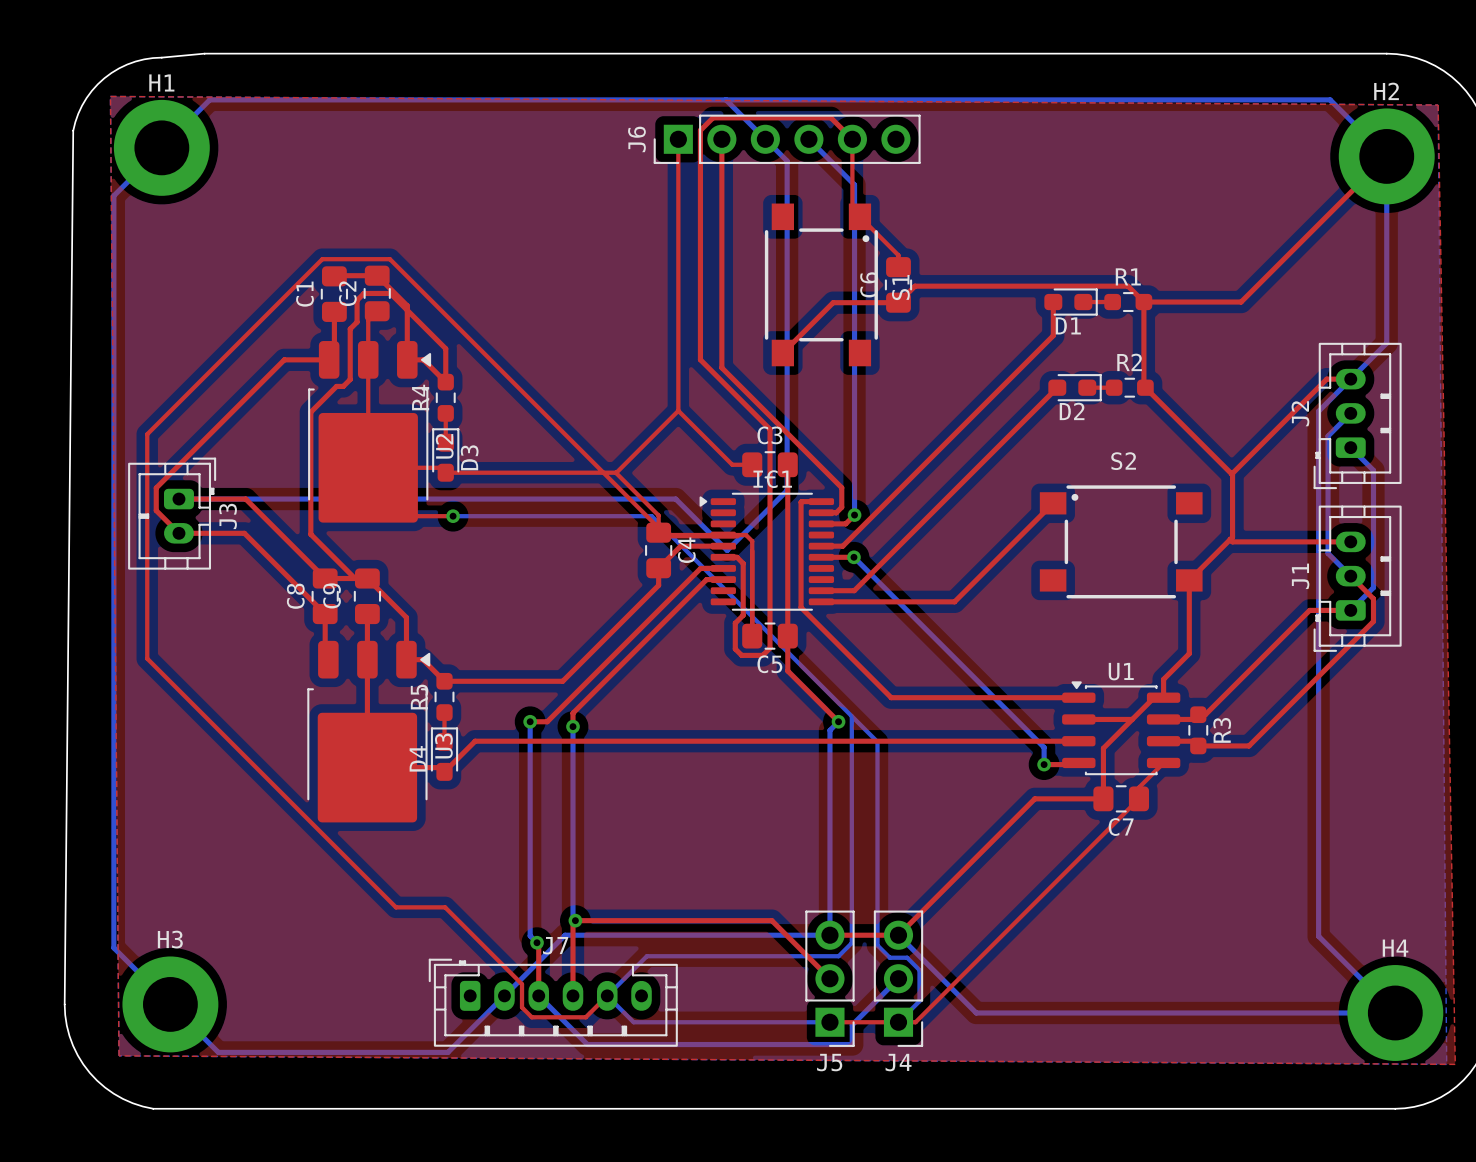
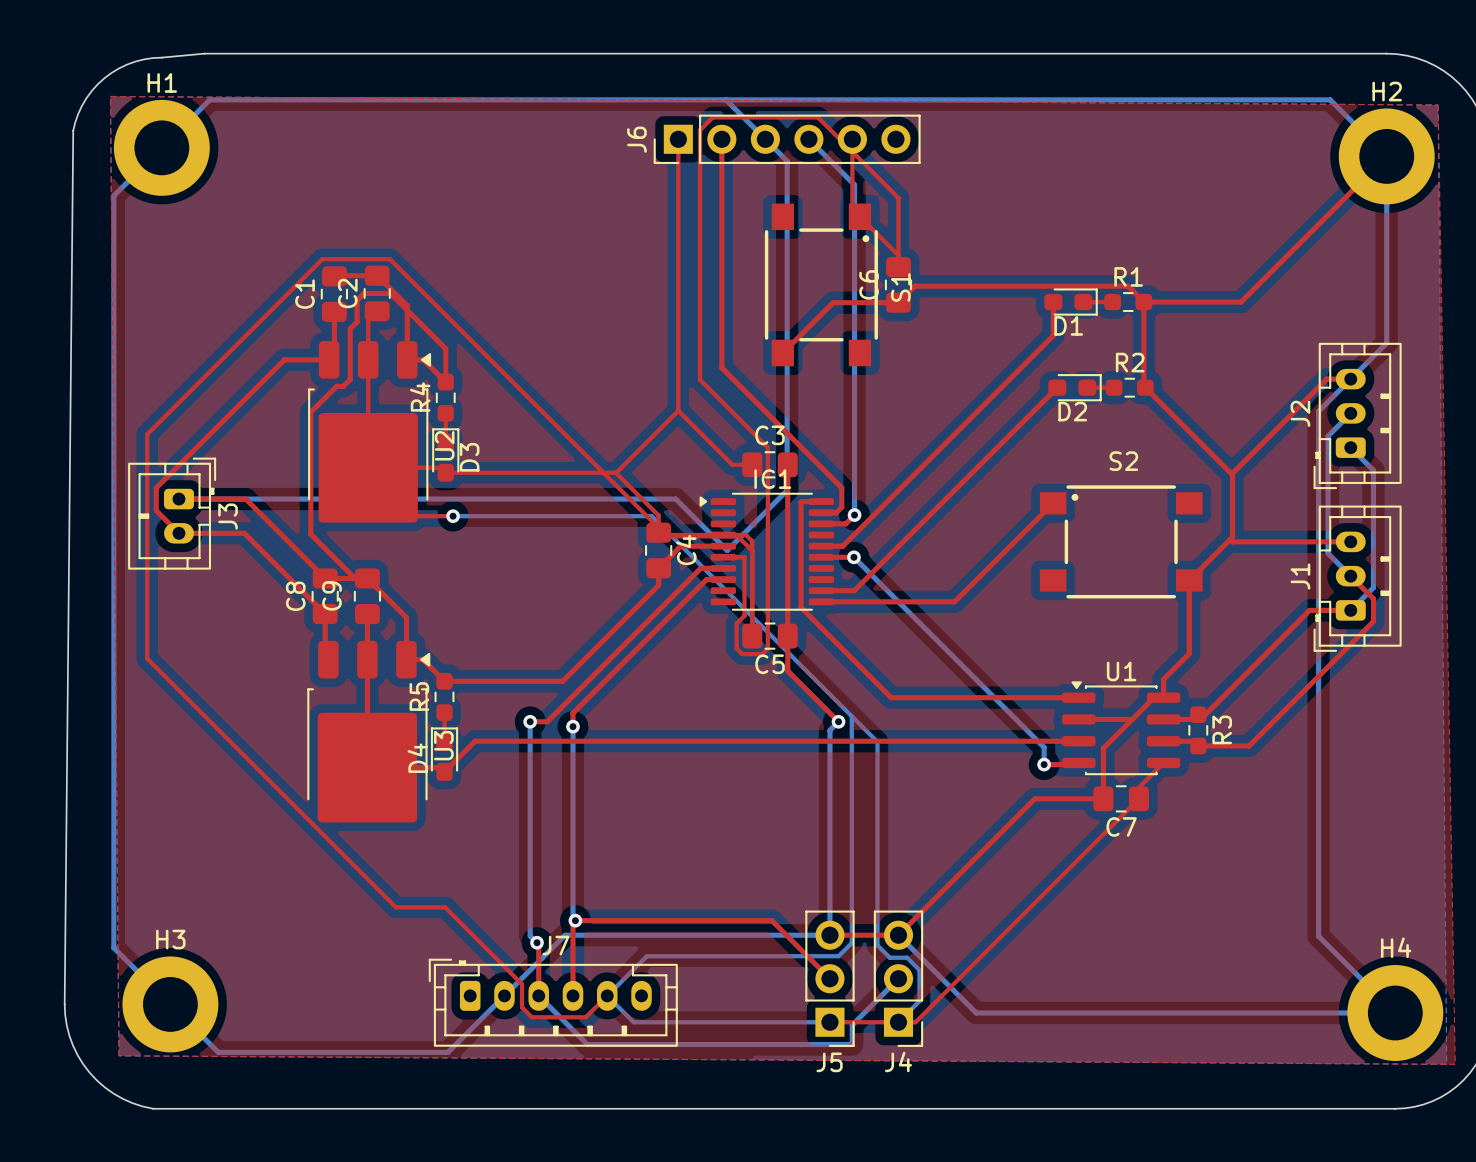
top track: (852, 139) (830, 117) (712, 117) (700, 130) (700, 359) (770, 429) (770, 648) (762, 655) (741, 655) (735, 648) (735, 623) (743, 615) (743, 563) (737, 557) -> (898, 255) (898, 197) (817, 117) (712, 117) (700, 130) (700, 379) (767, 447) (767, 648) (762, 654) (742, 654) (736, 648) (736, 623) (744, 615) (744, 557) (737, 557)
top track: none -> (737, 536) (752, 550)

